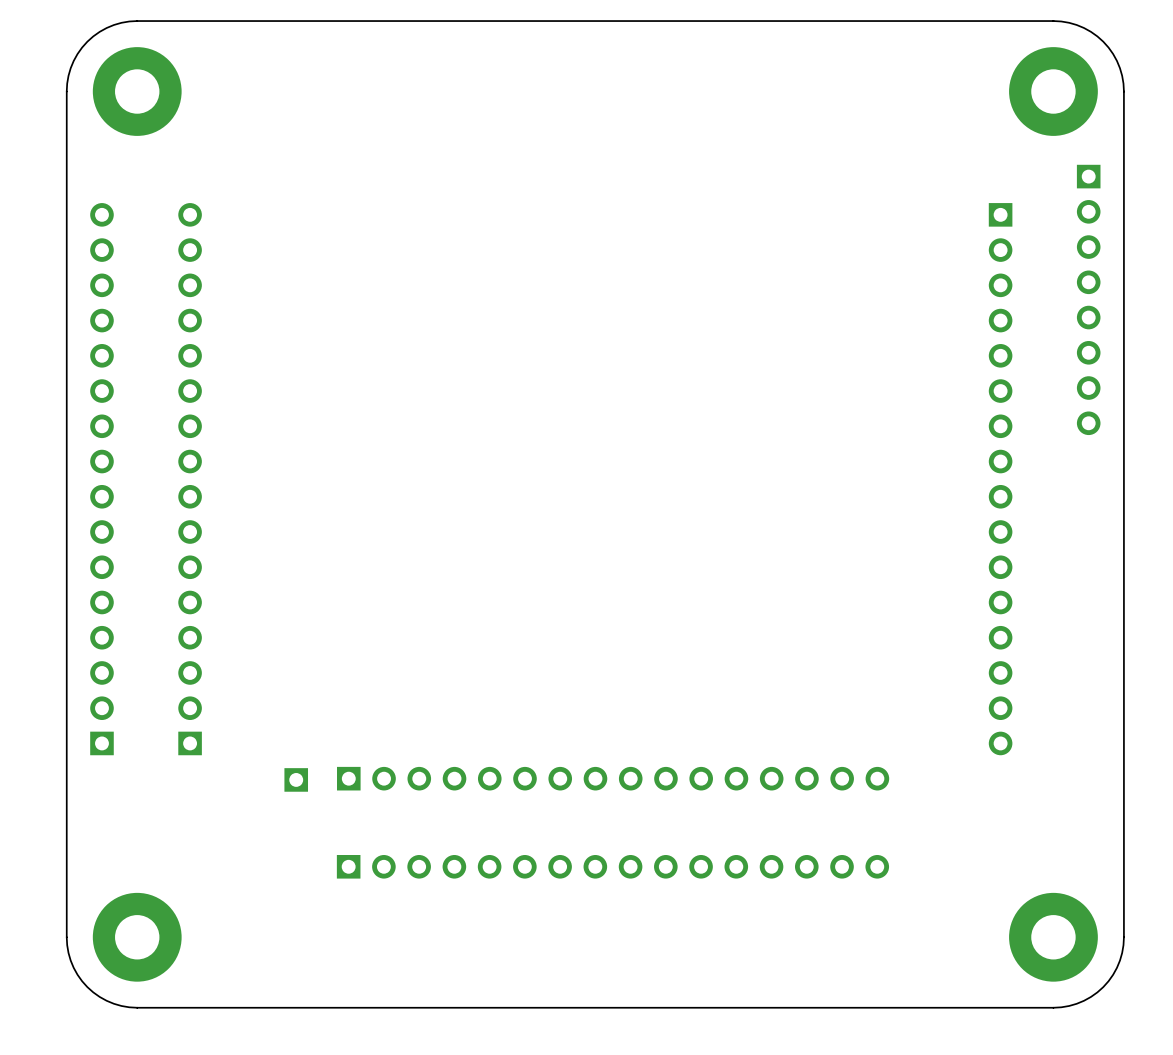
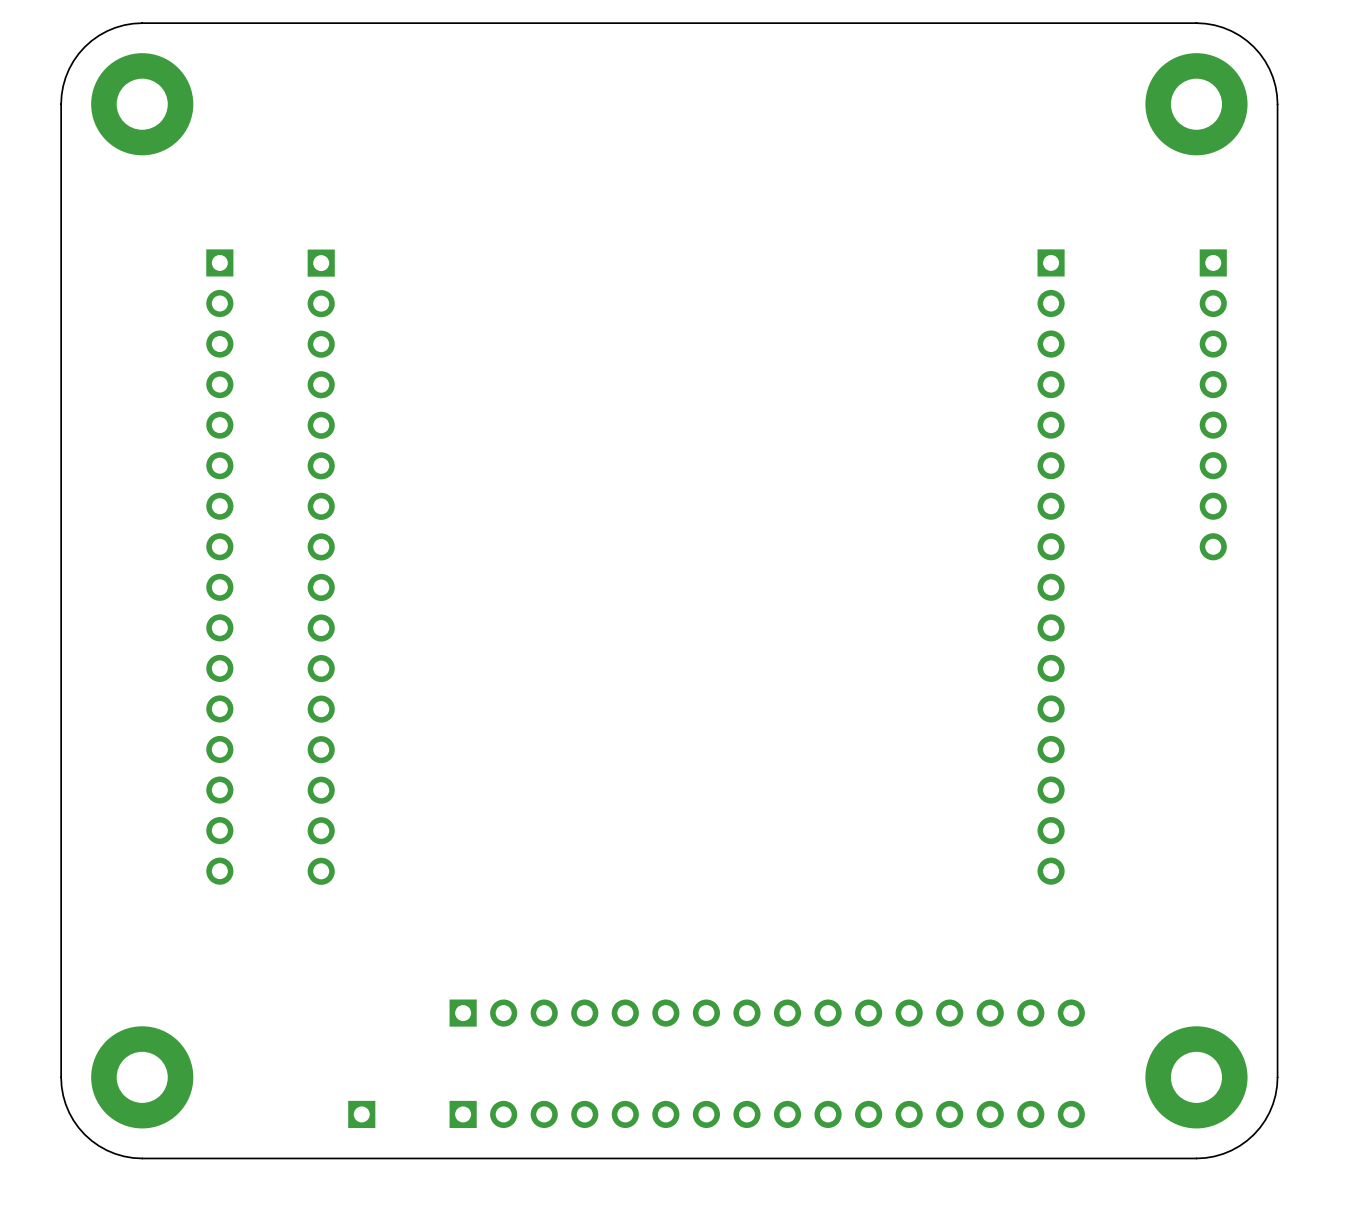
part position: (1088, 299) -> (1213, 404)
part: (101, 479) -> none
part rotation: 0° (190, 479) -> 180° (219, 567)
part position: (1000, 479) -> (1051, 567)
part: none -> (321, 567)
part: (613, 778) -> none
part position: (296, 779) -> (361, 1114)
part: (612, 866) -> none
part: none -> (767, 1013)
part: none -> (767, 1114)

